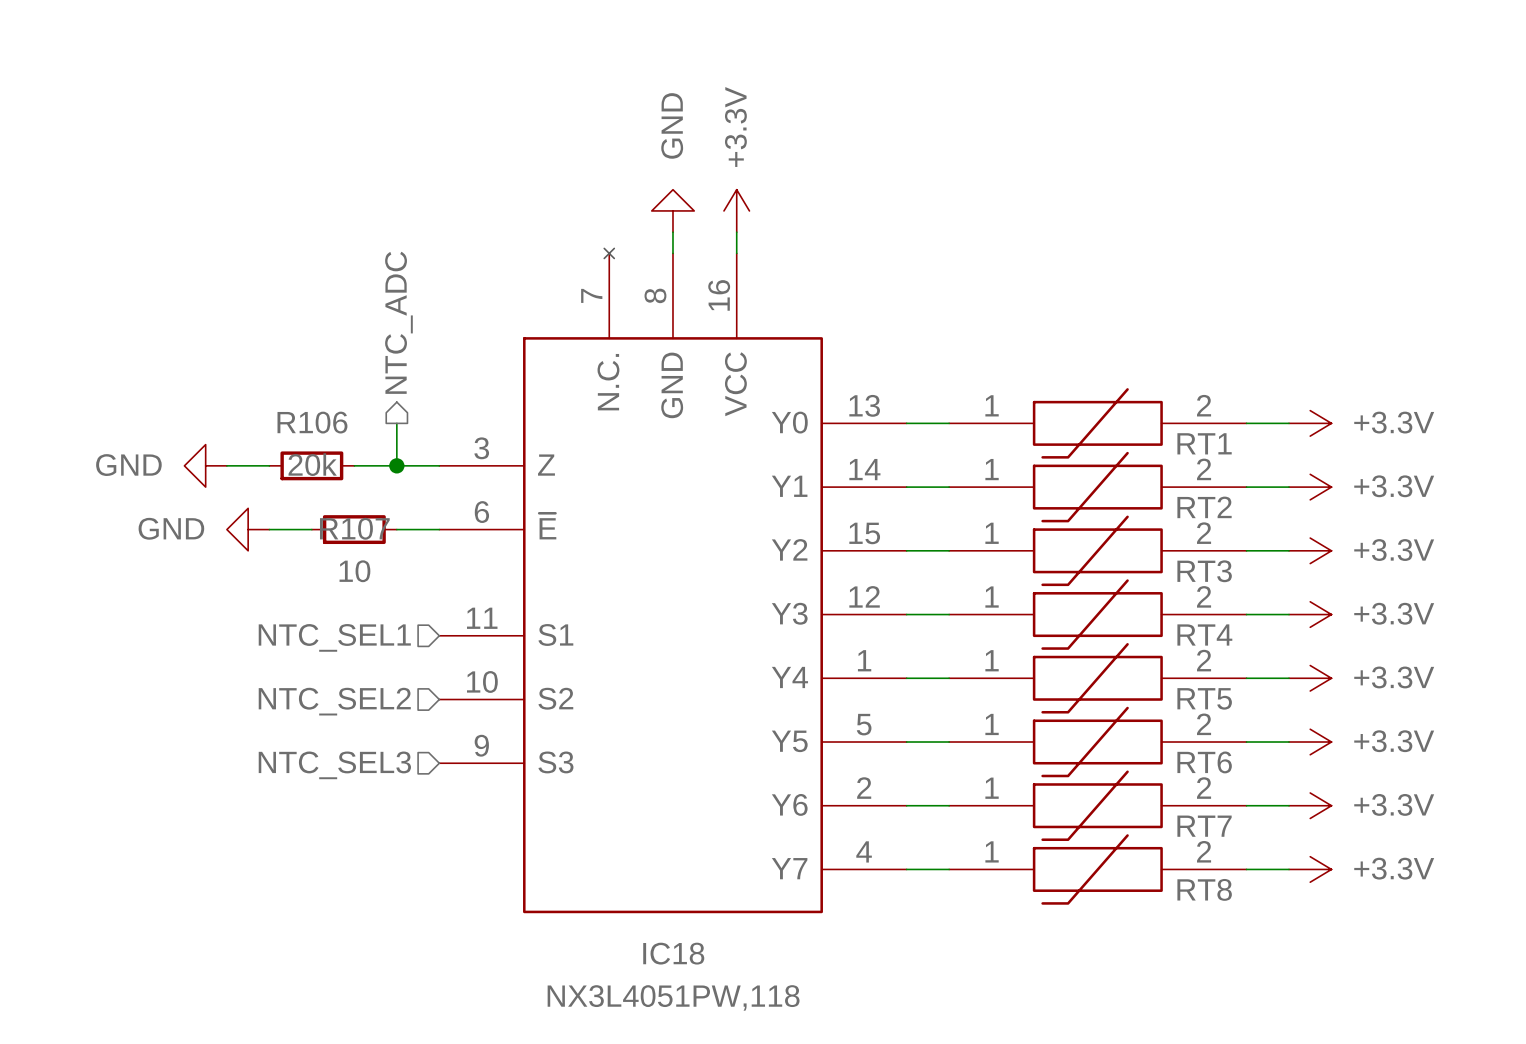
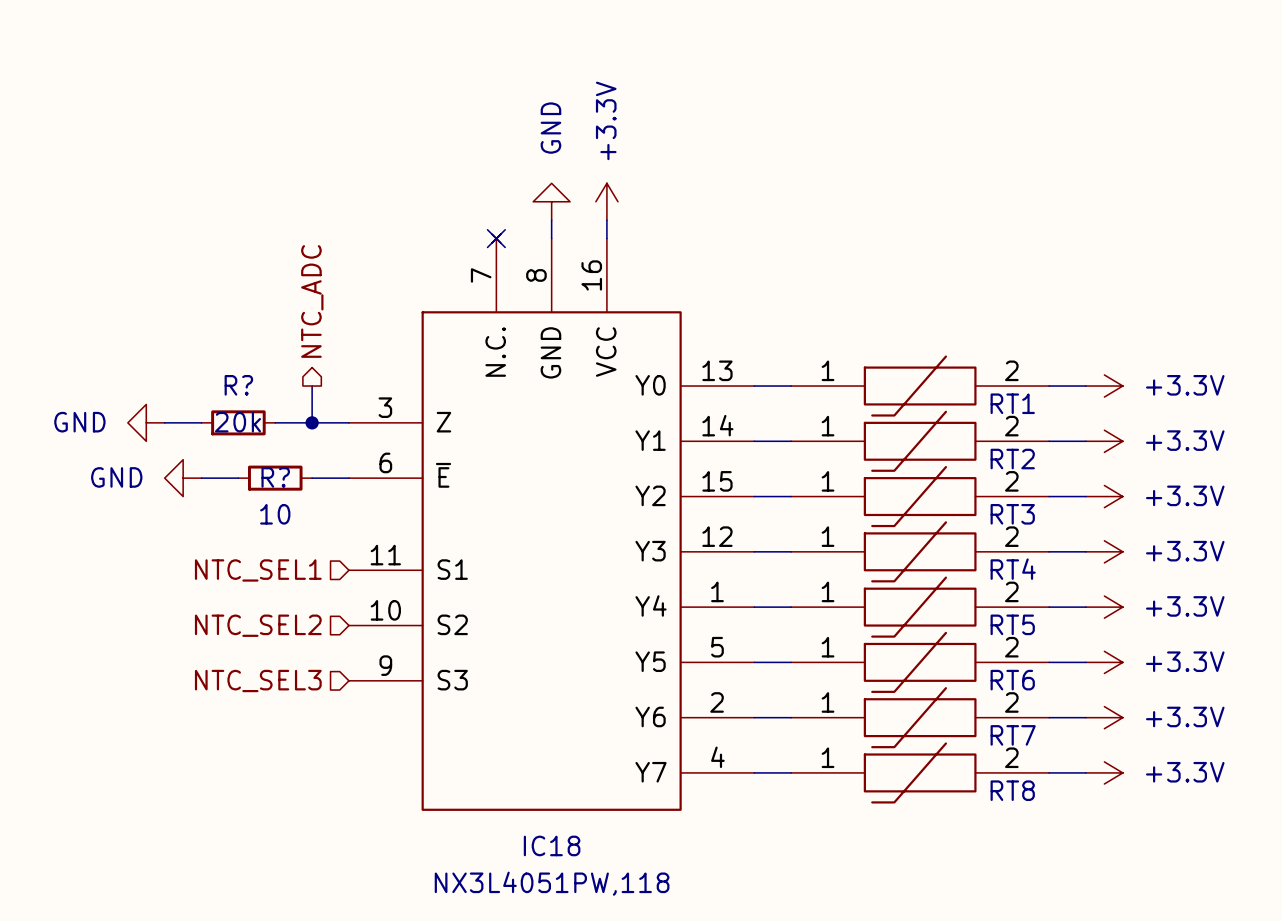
no-connect mark: none -> (496, 238)
R106 name: R106 (312, 422) -> R? (238, 385)
R107 name: R107 (354, 528) -> R? (275, 477)

